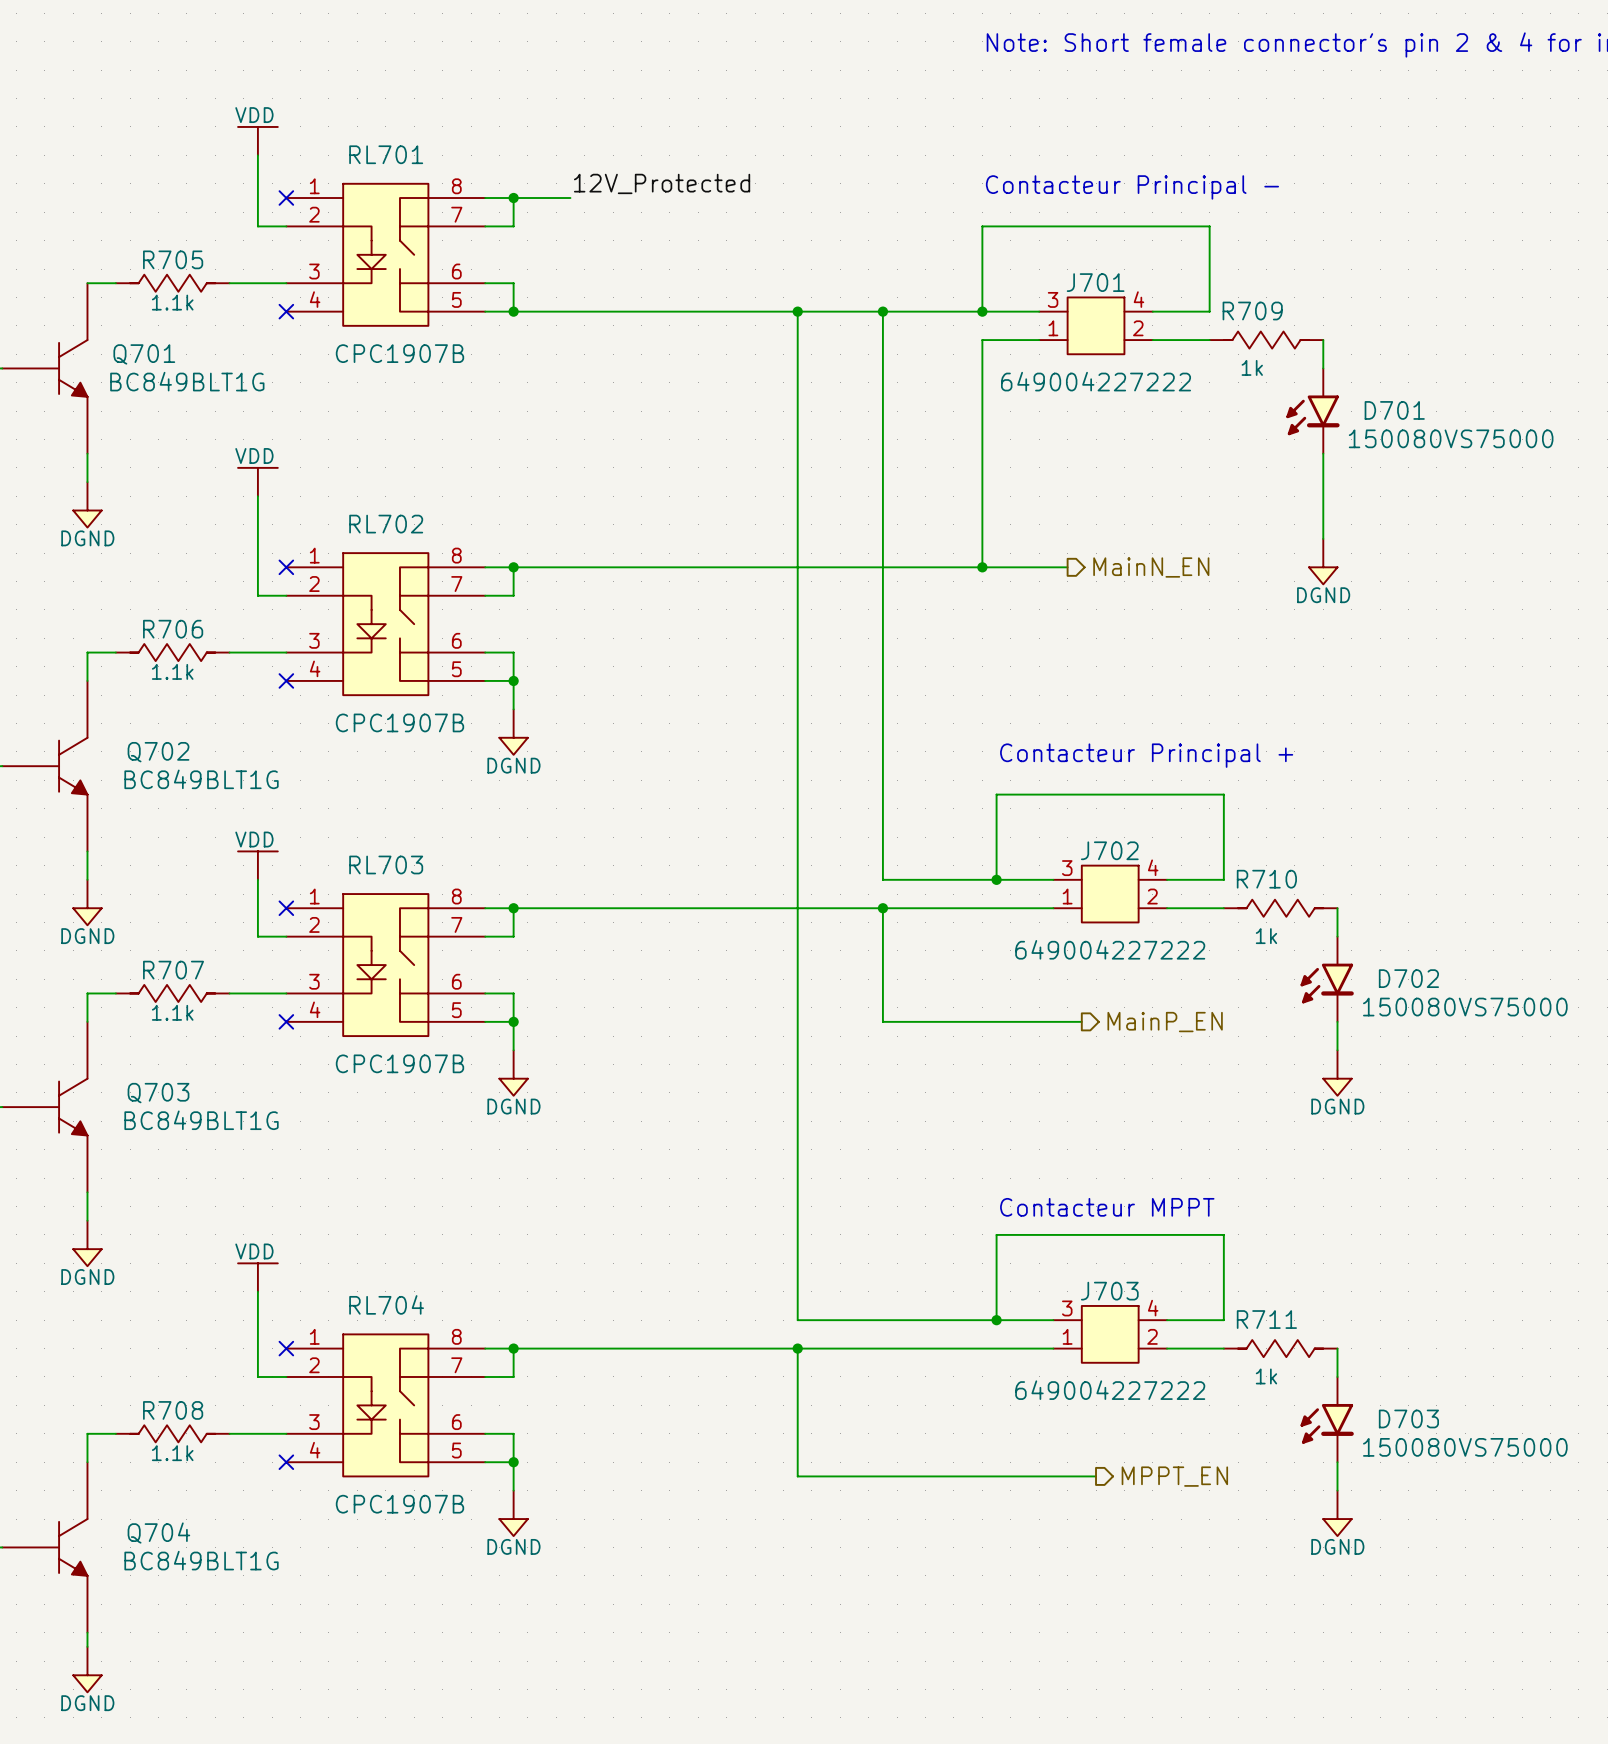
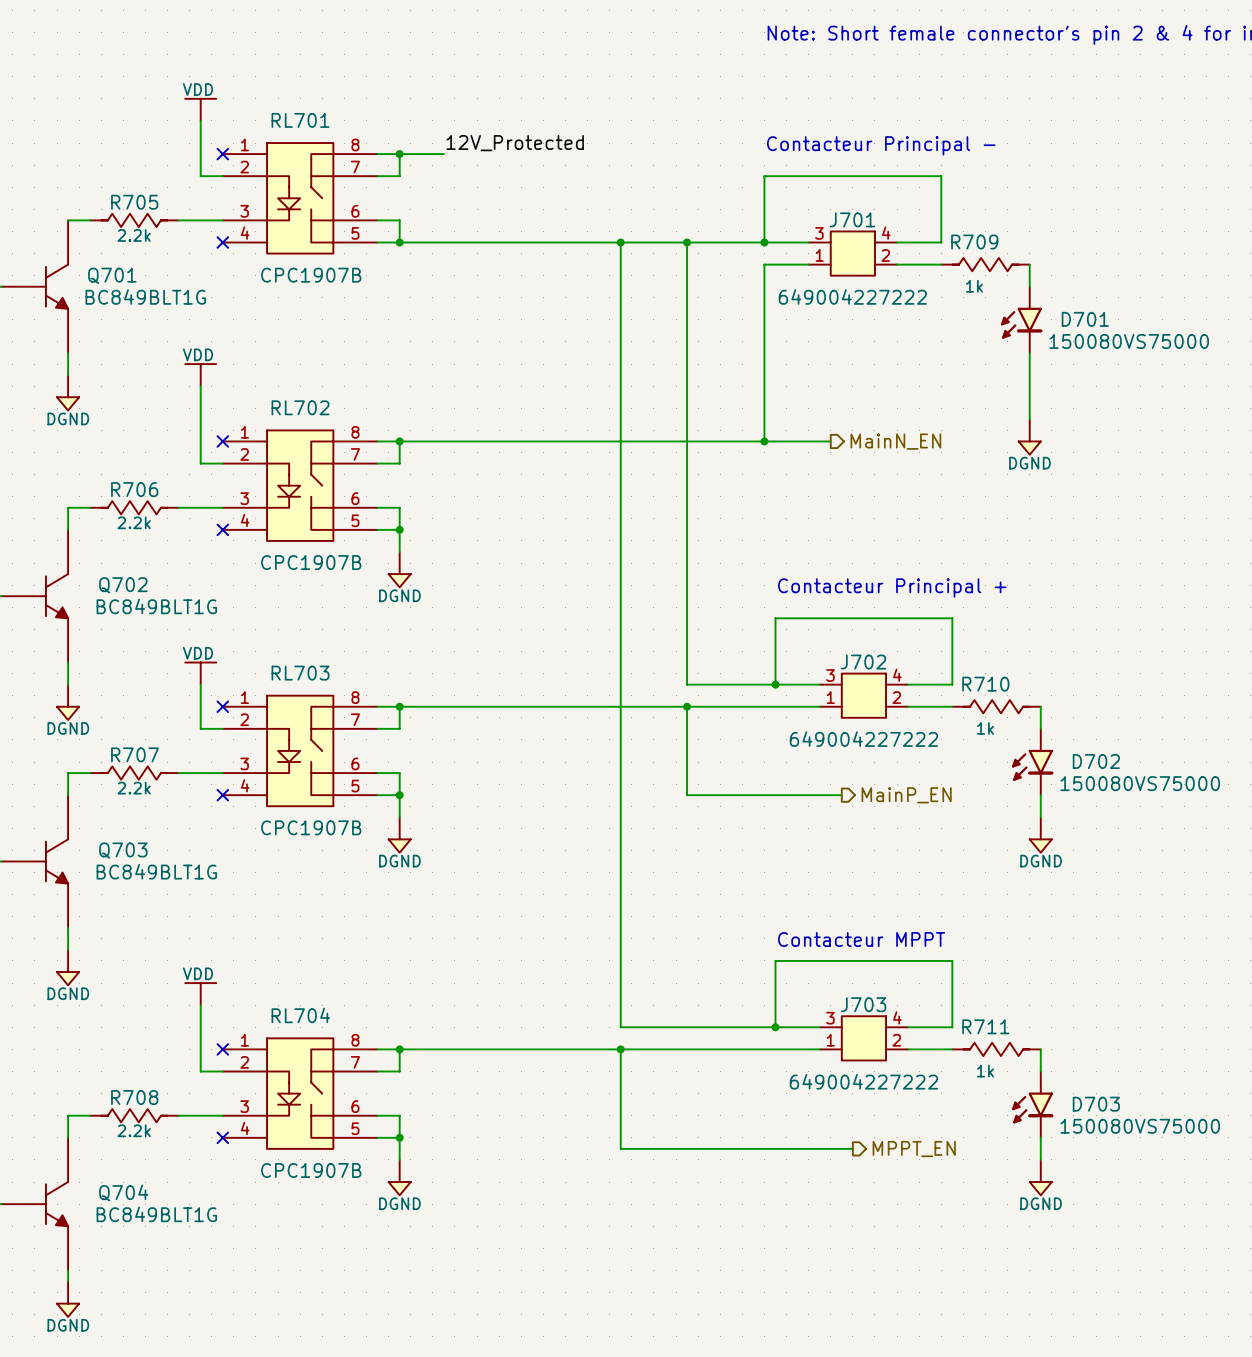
R705 text: 1.1k (172, 302) -> 2.2k (134, 235)
R706 text: 1.1k (172, 671) -> 2.2k (134, 522)
R707 text: 1.1k (172, 1012) -> 2.2k (134, 788)
R708 text: 1.1k (172, 1453) -> 2.2k (134, 1130)

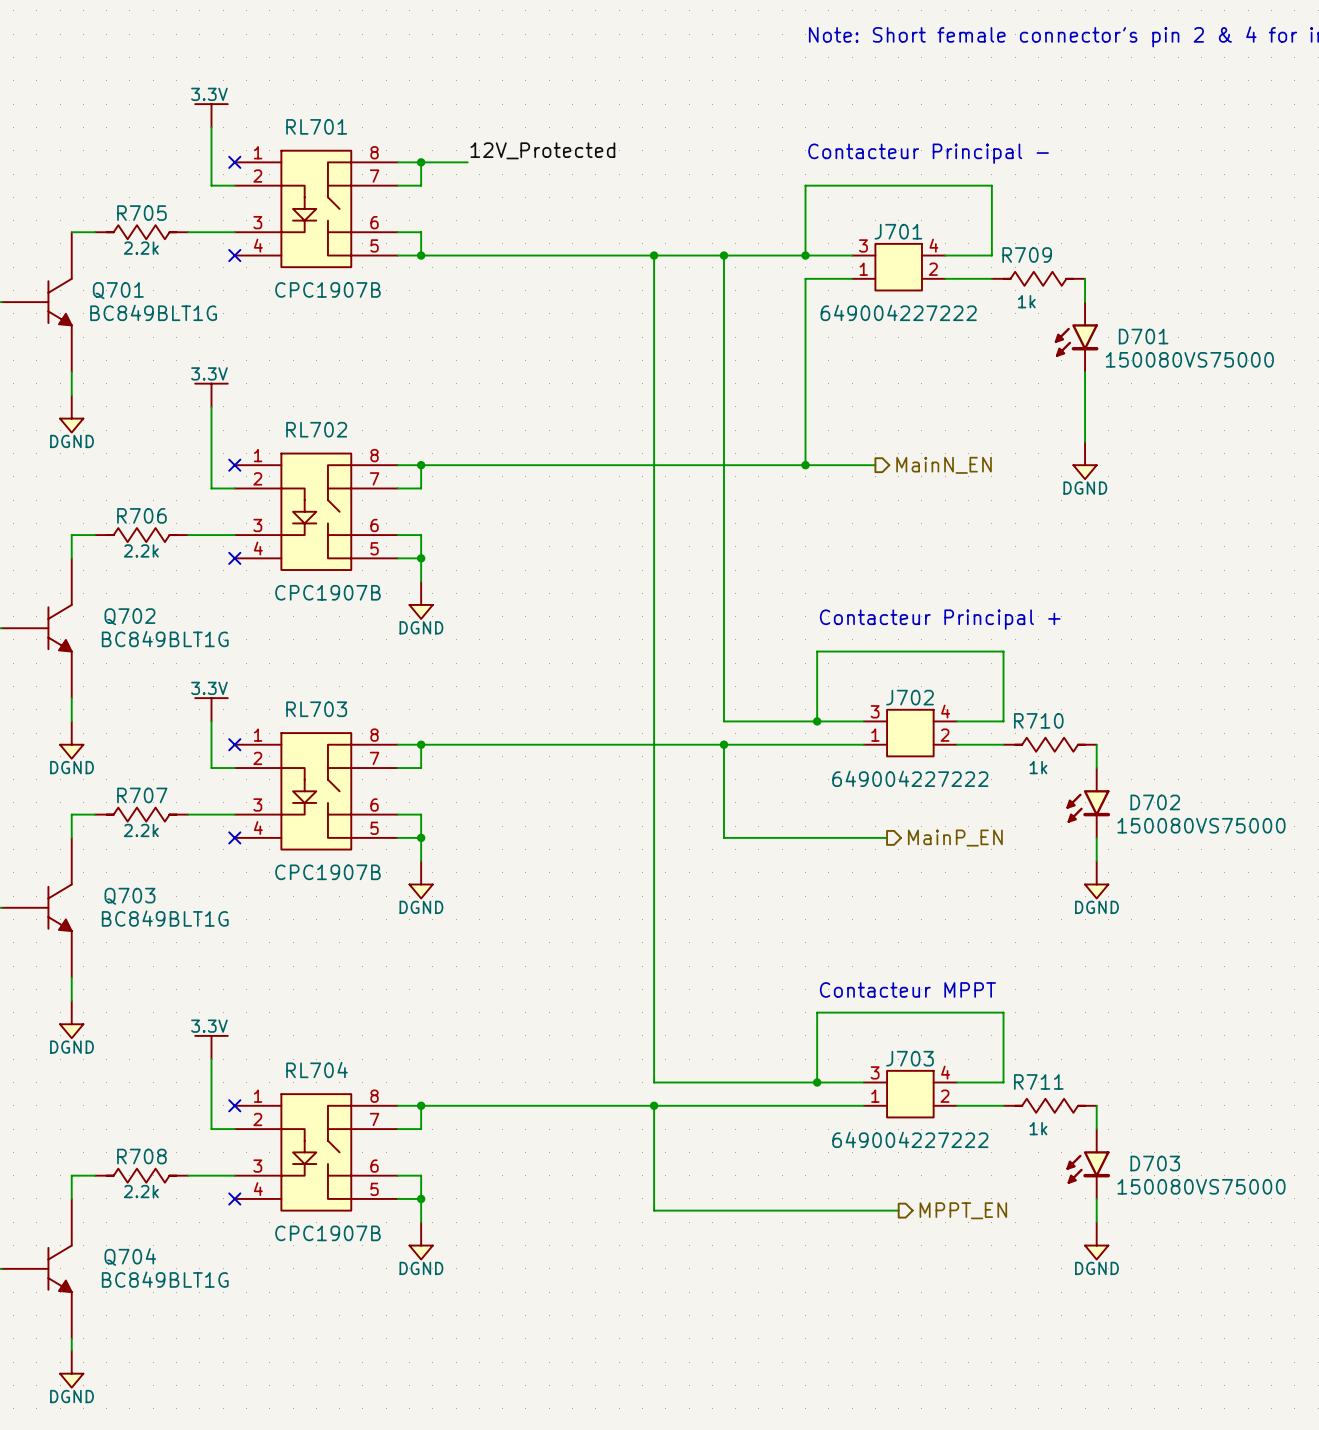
power symbol: VDD (200, 109) -> 3.3V (211, 115)
power symbol: VDD (200, 375) -> 3.3V (211, 395)
power symbol: VDD (200, 673) -> 3.3V (211, 709)
power symbol: VDD (200, 994) -> 3.3V (211, 1047)

